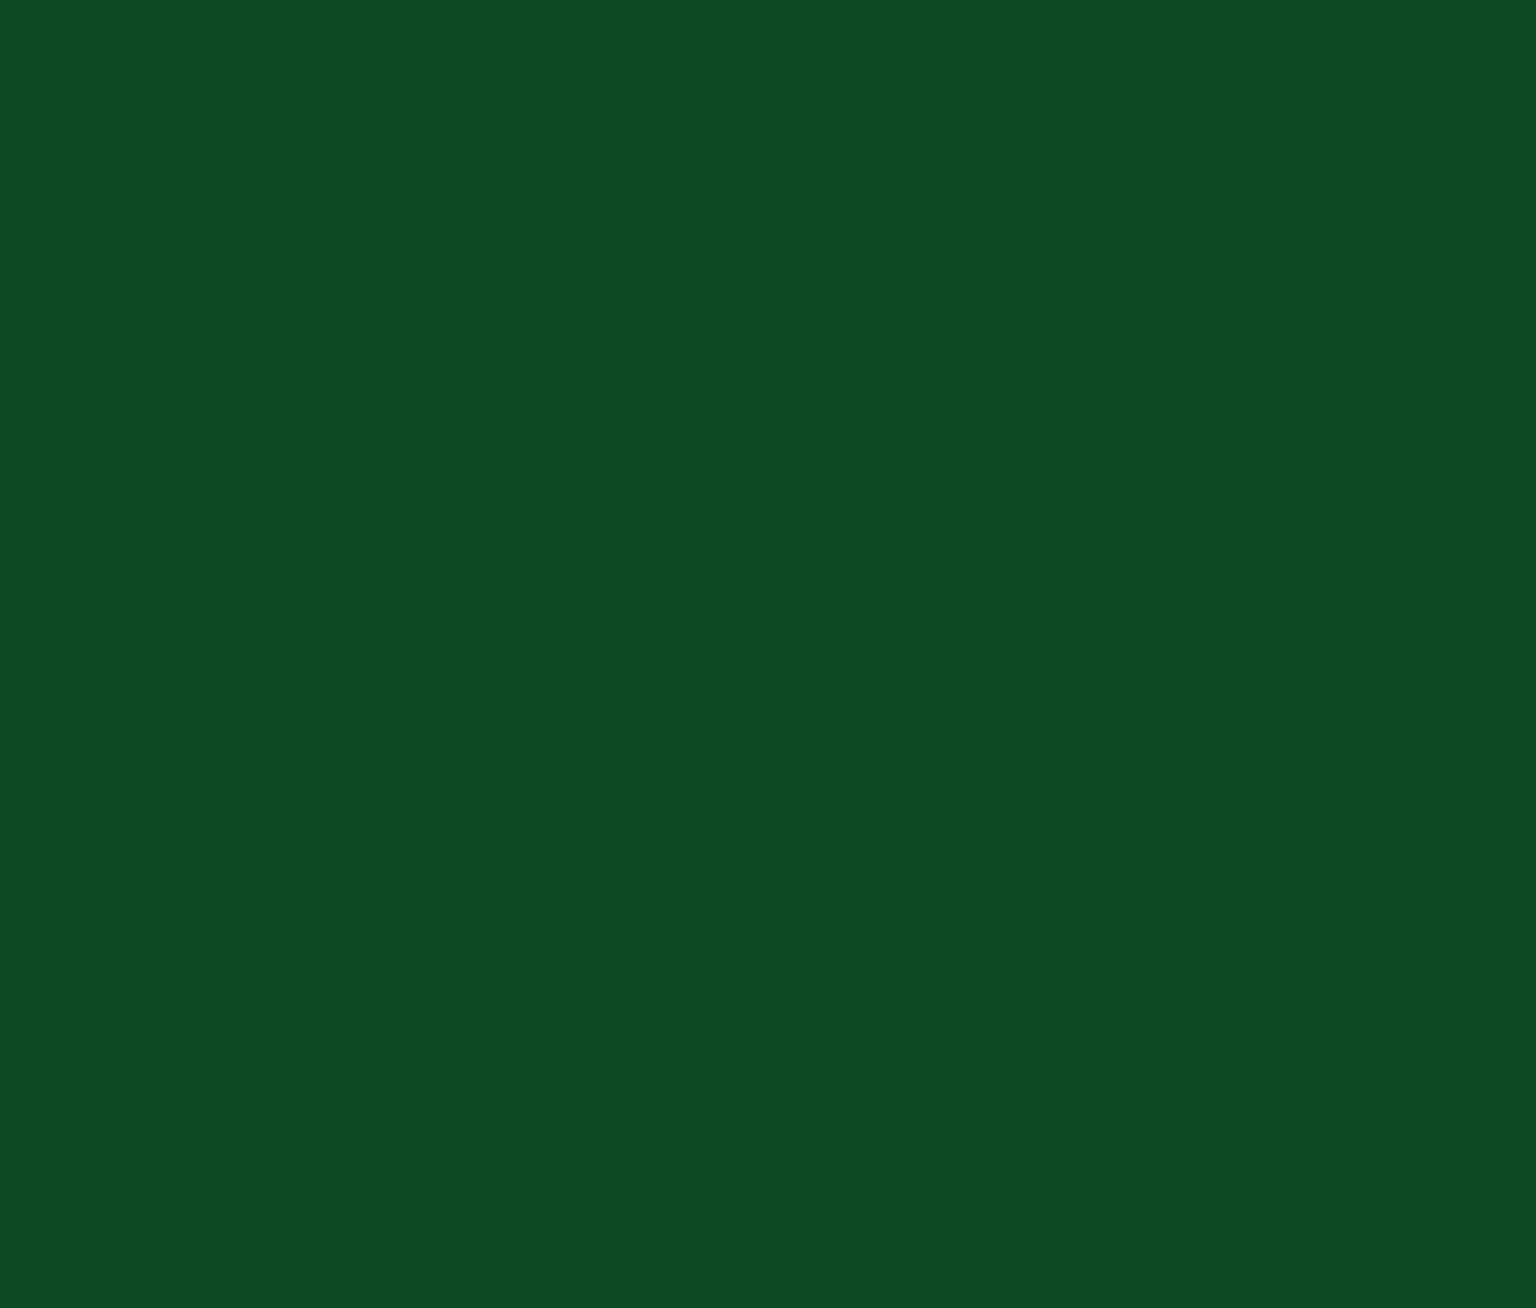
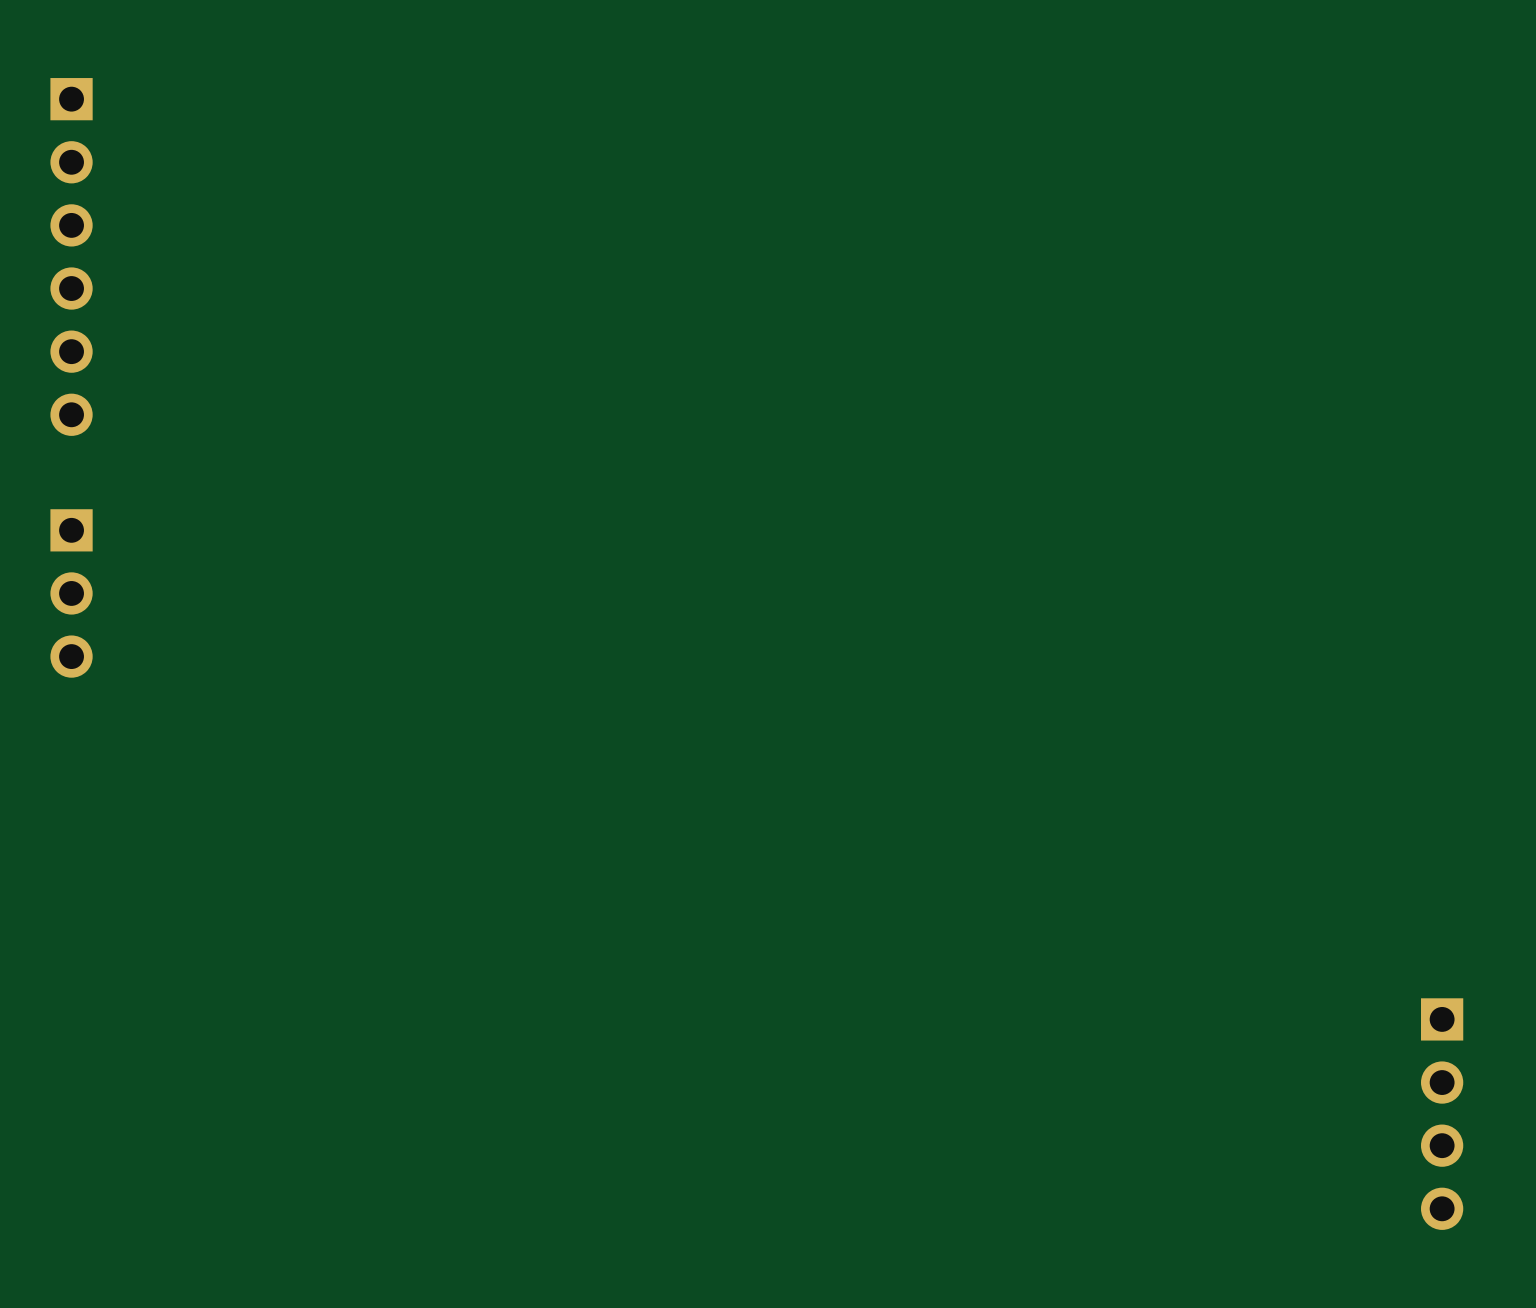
part: none -> (71, 256)
part: none -> (71, 593)
part: none -> (1442, 1114)

